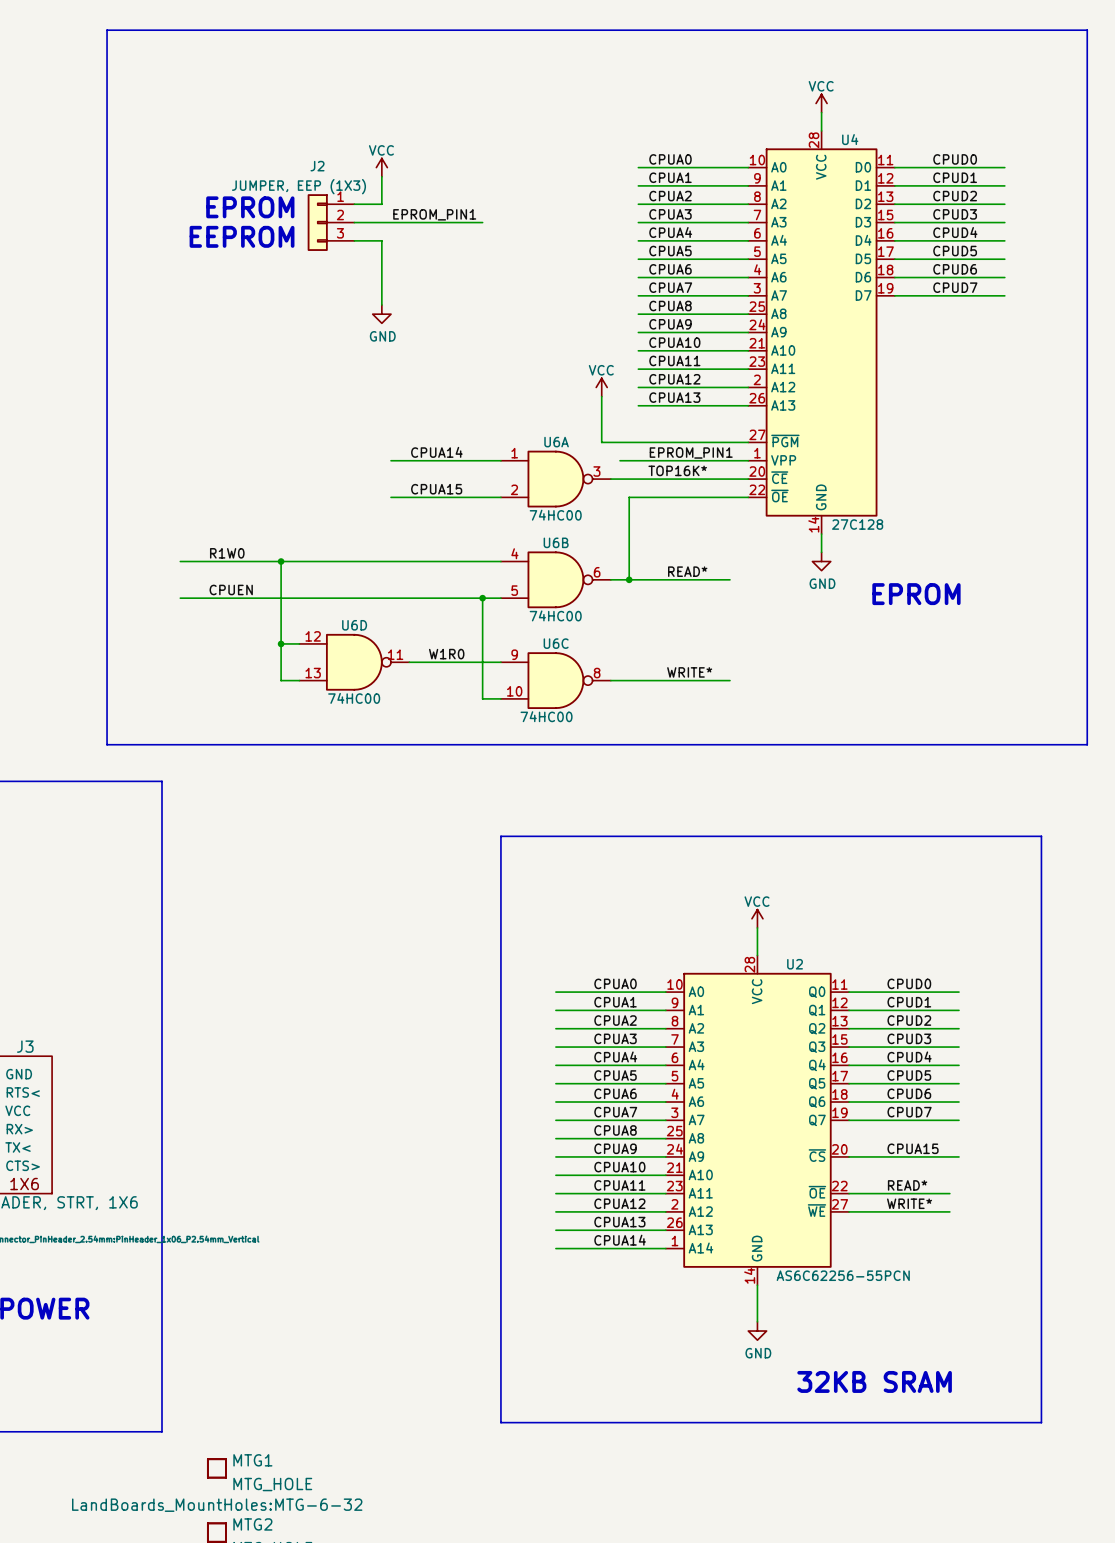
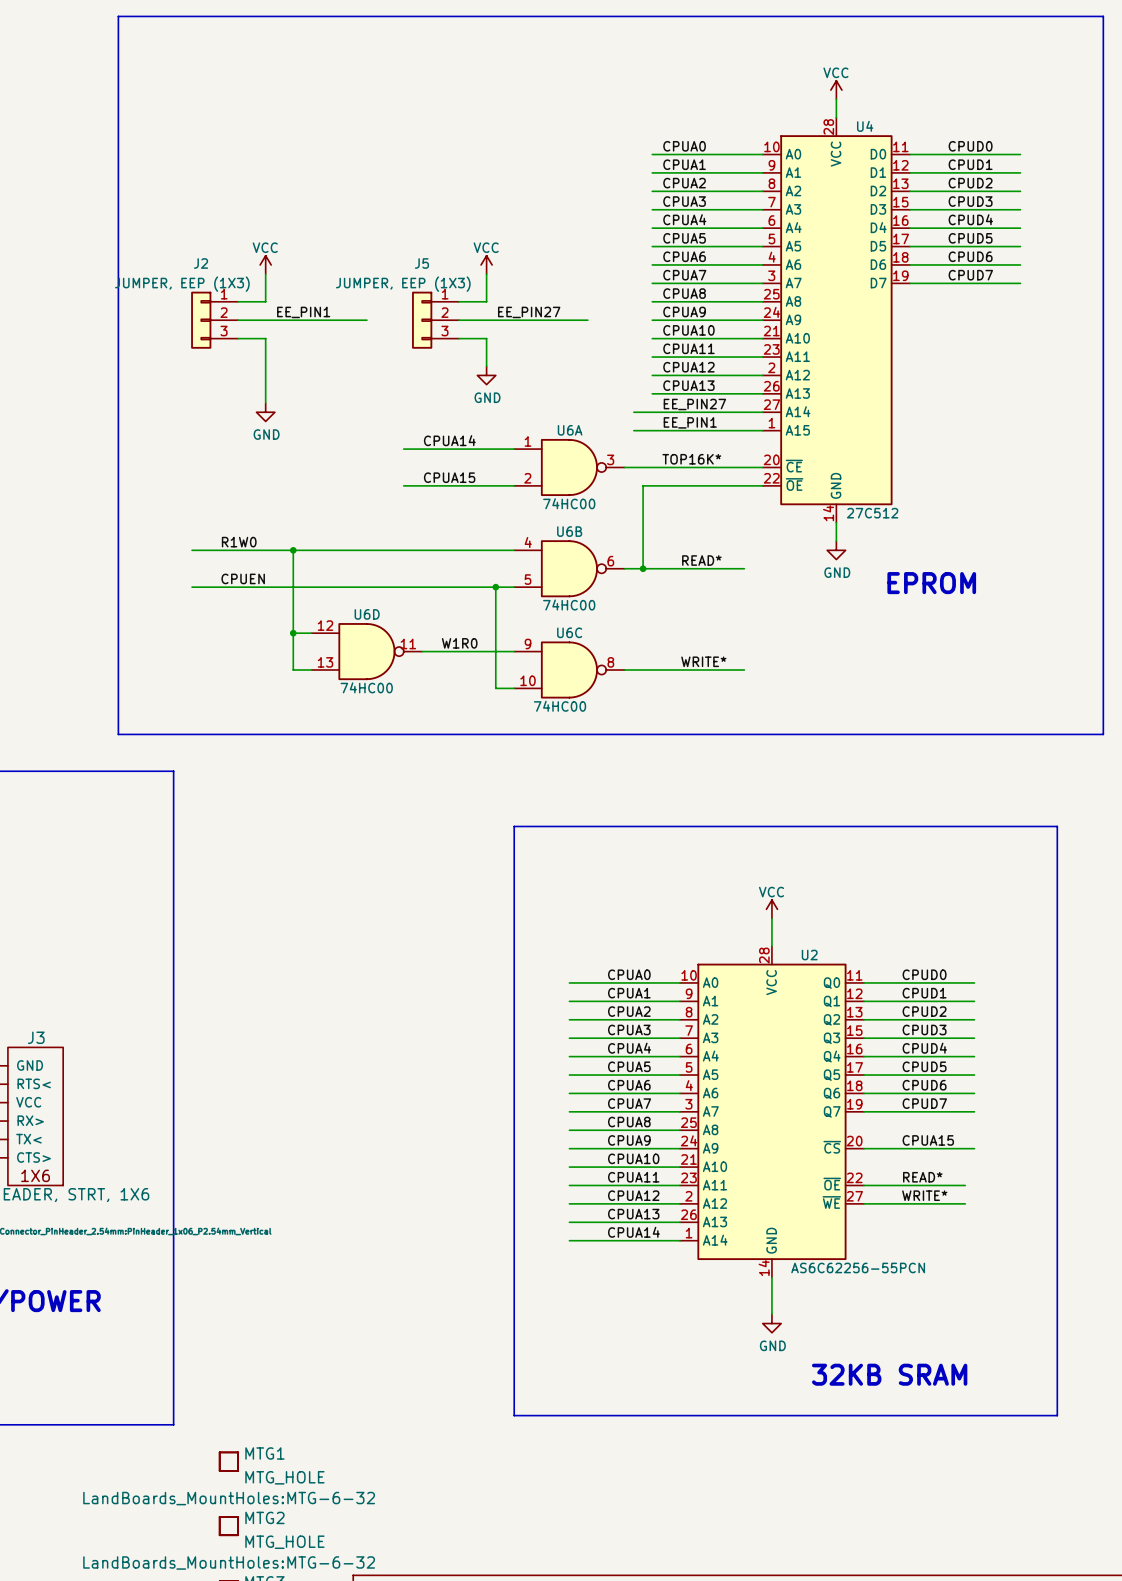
U4 symbol: [748, 130, 895, 535] -> [762, 117, 911, 523]
power symbol: VCC (381, 167) -> none
wire: (381, 176) (381, 204) (354, 204) -> (265, 274) (265, 301) (238, 301)
text: EPROM (250, 207) -> none
label: EPROM_PIN1 (434, 214) -> none
J2 position: (331, 222) -> (214, 320)
wire: (354, 222) (482, 222) -> (238, 320) (366, 320)
text: EEPROM (242, 236) -> none
wire: (354, 240) (381, 240) (381, 305) -> (238, 338) (265, 338) (265, 403)
power symbol: none -> VCC (265, 264)
power symbol: none -> VCC (486, 264)
wire: none -> (486, 274) (486, 301) (458, 301)
power symbol: GND (381, 314) -> none
label: none -> EE_PIN1 (303, 312)
label: none -> EE_PIN27 (529, 312)
J5: none -> JUMPER, EEP (1X3) (435, 320)
wire: none -> (458, 320) (587, 320)
wire: none -> (458, 338) (486, 338) (486, 366)
power symbol: none -> GND (486, 375)
power symbol: VCC (601, 387) -> none
wire: (601, 396) (601, 442) (620, 442) -> none
label: none -> EE_PIN27 (694, 404)
power symbol: none -> GND (265, 412)
label: EPROM_PIN1 (691, 453) -> EE_PIN1 (690, 422)
wire: (620, 460) (748, 460) -> (633, 412) (762, 412)
U4 value: 27C128 (857, 524) -> 27C512 (872, 513)

